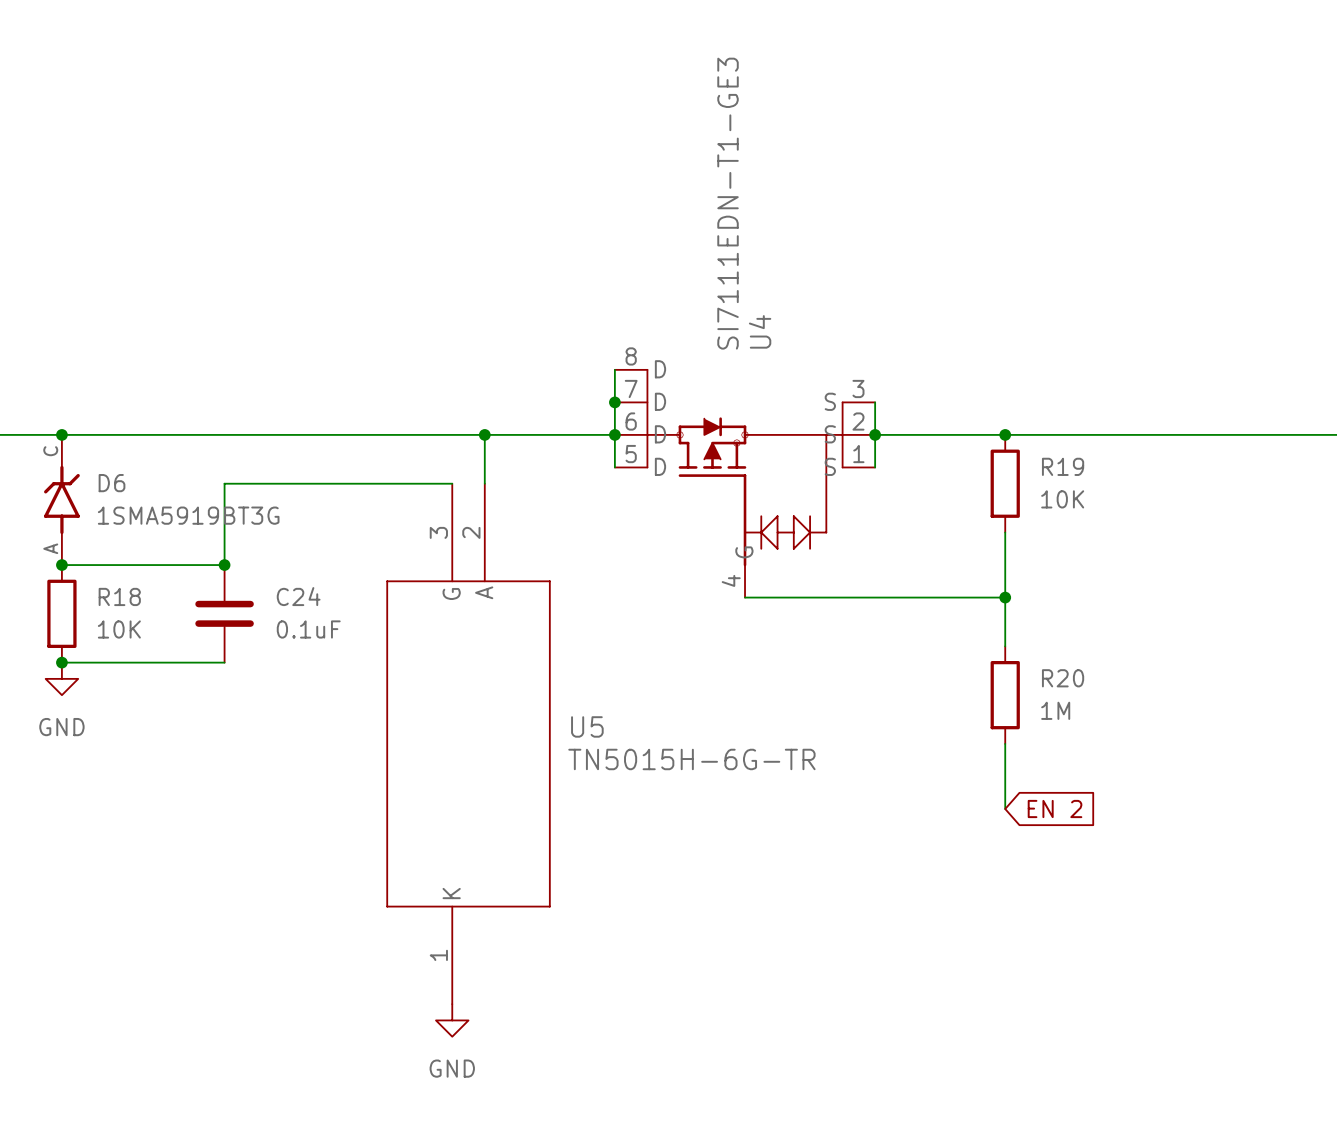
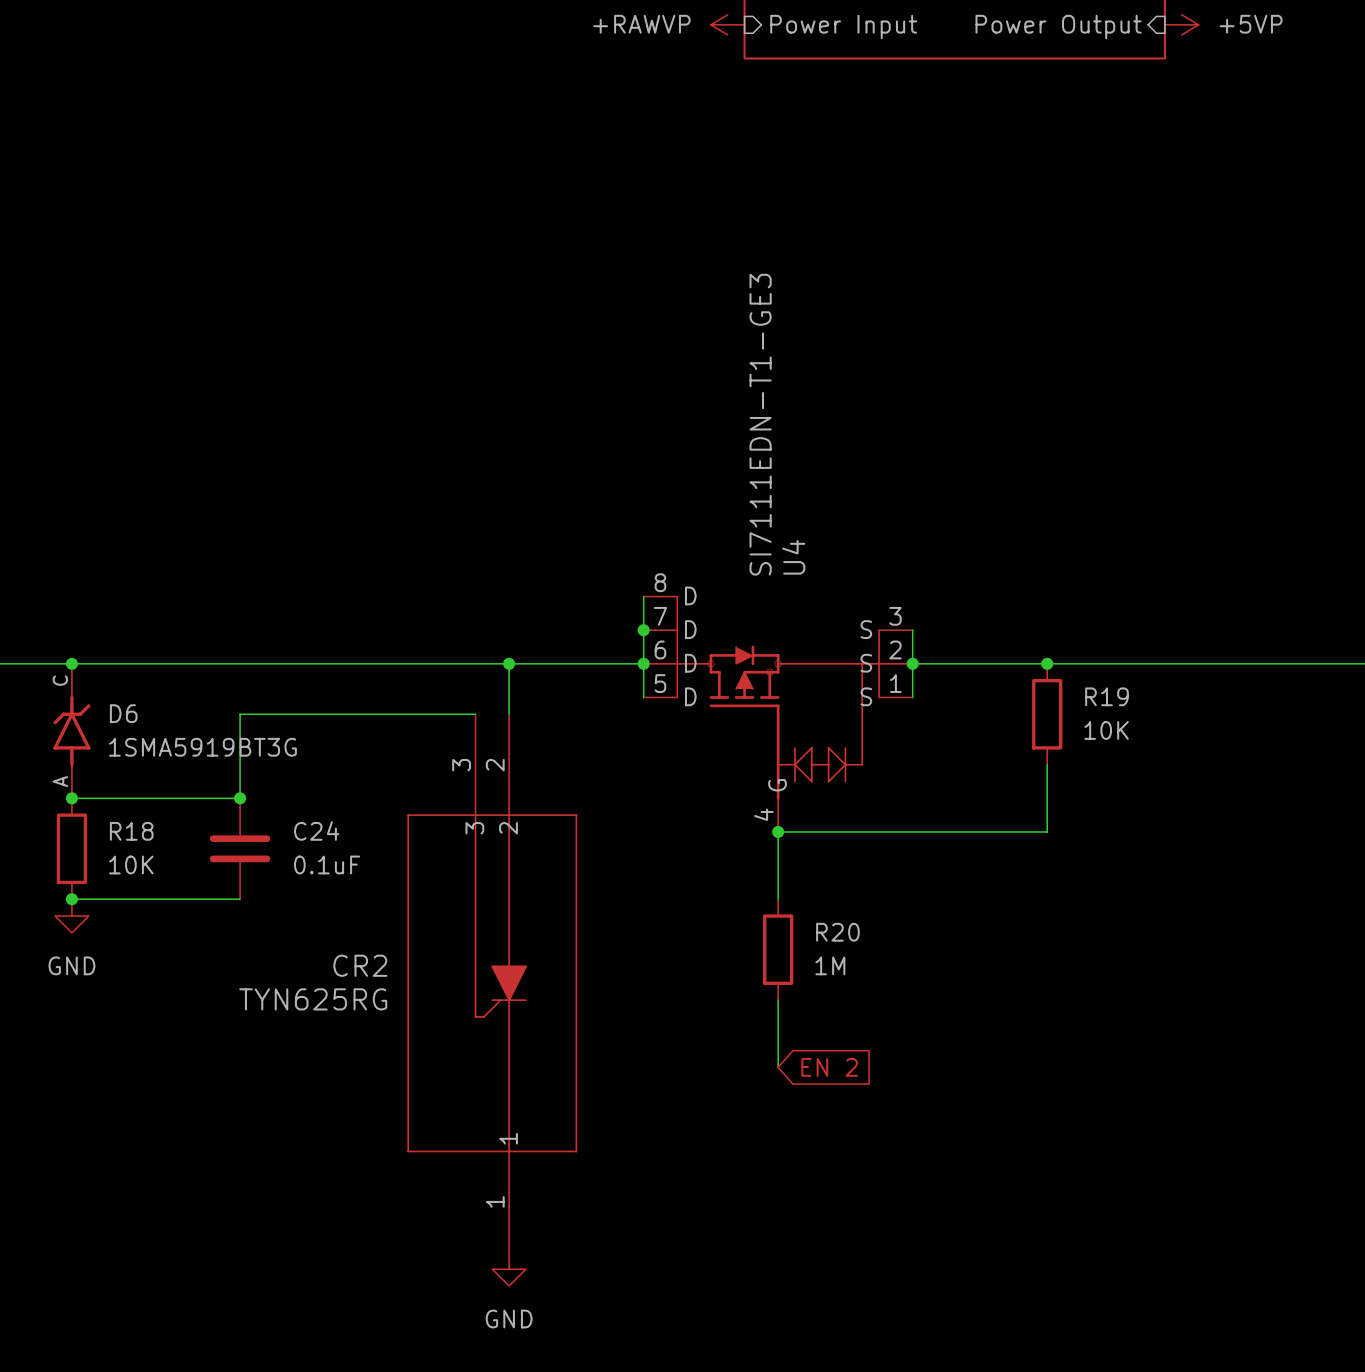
wire: none -> (778, 831) (778, 899)
junction: none -> (778, 831)
wire: (1005, 597) (1005, 646) -> none
junction: (1005, 597) -> none
R20 position: (1005, 695) -> (778, 949)
U5: TN5015H-6G-TR (468, 743) -> none
CR2: none -> TYN625RG (492, 983)
wire: (1005, 743) (1005, 809) -> (778, 1000) (778, 1067)
global label position: EN 2 (1055, 809) -> EN 2 (829, 1067)
power symbol position: GND (452, 1020) -> GND (509, 1269)

